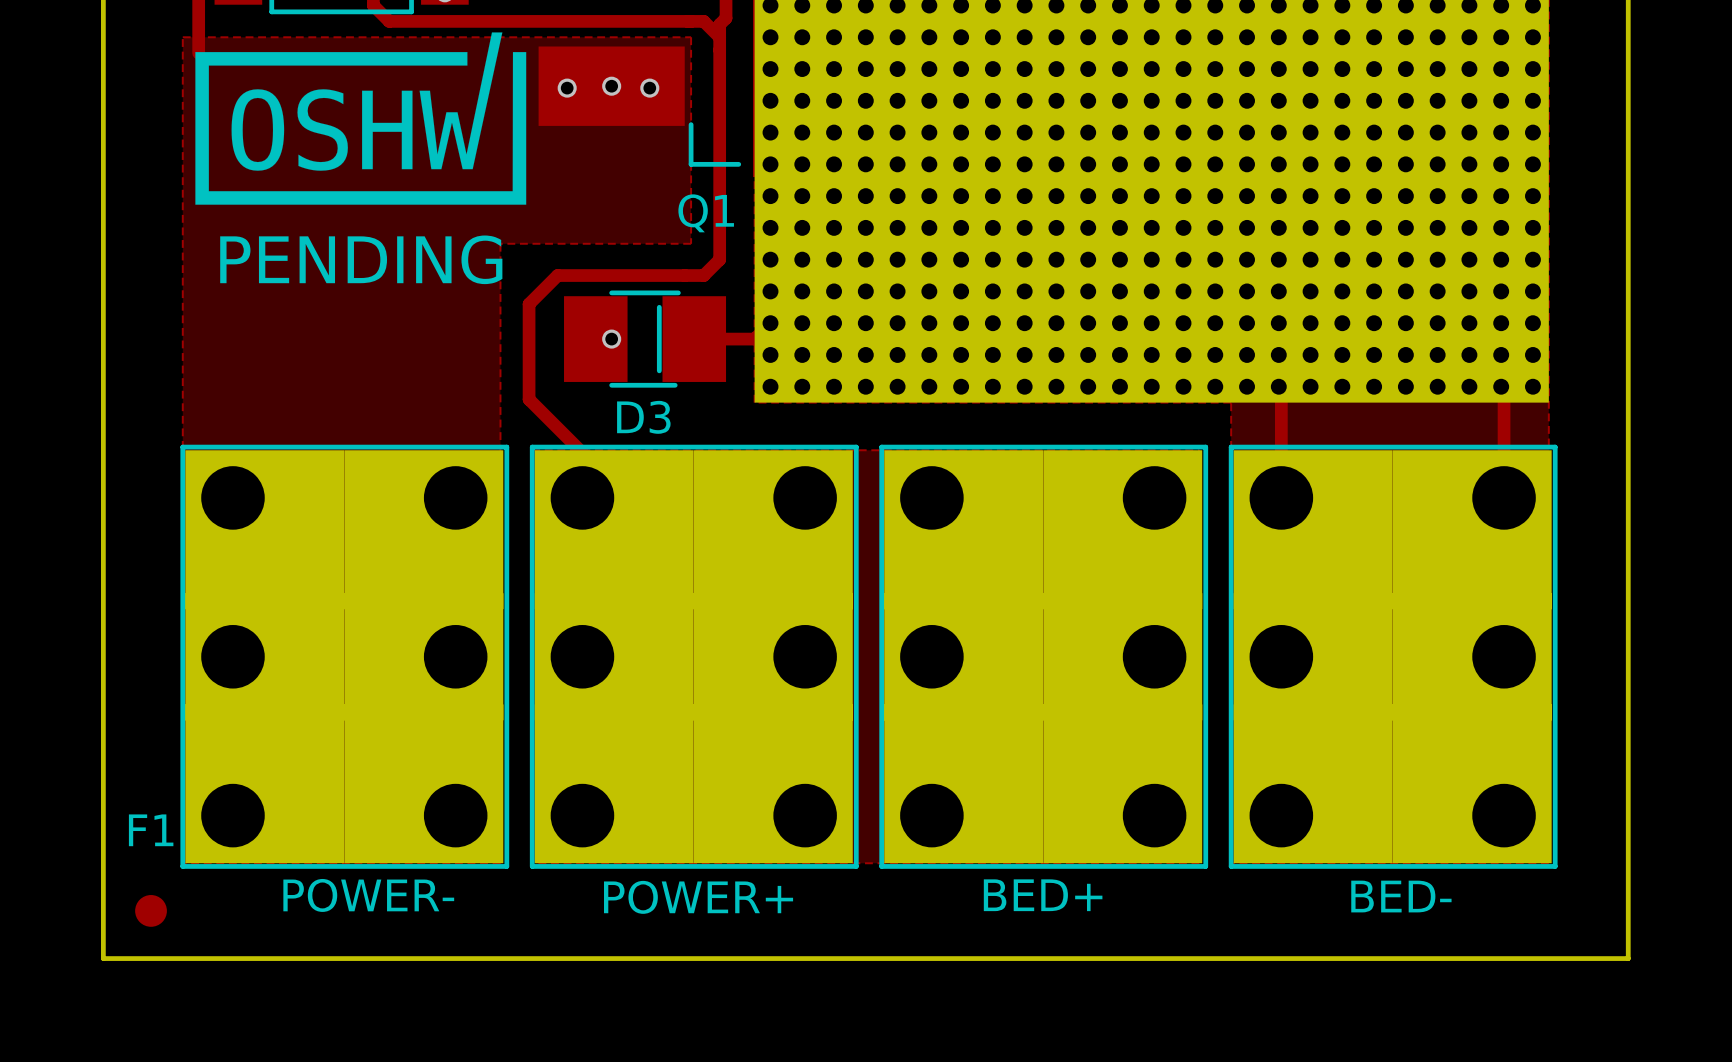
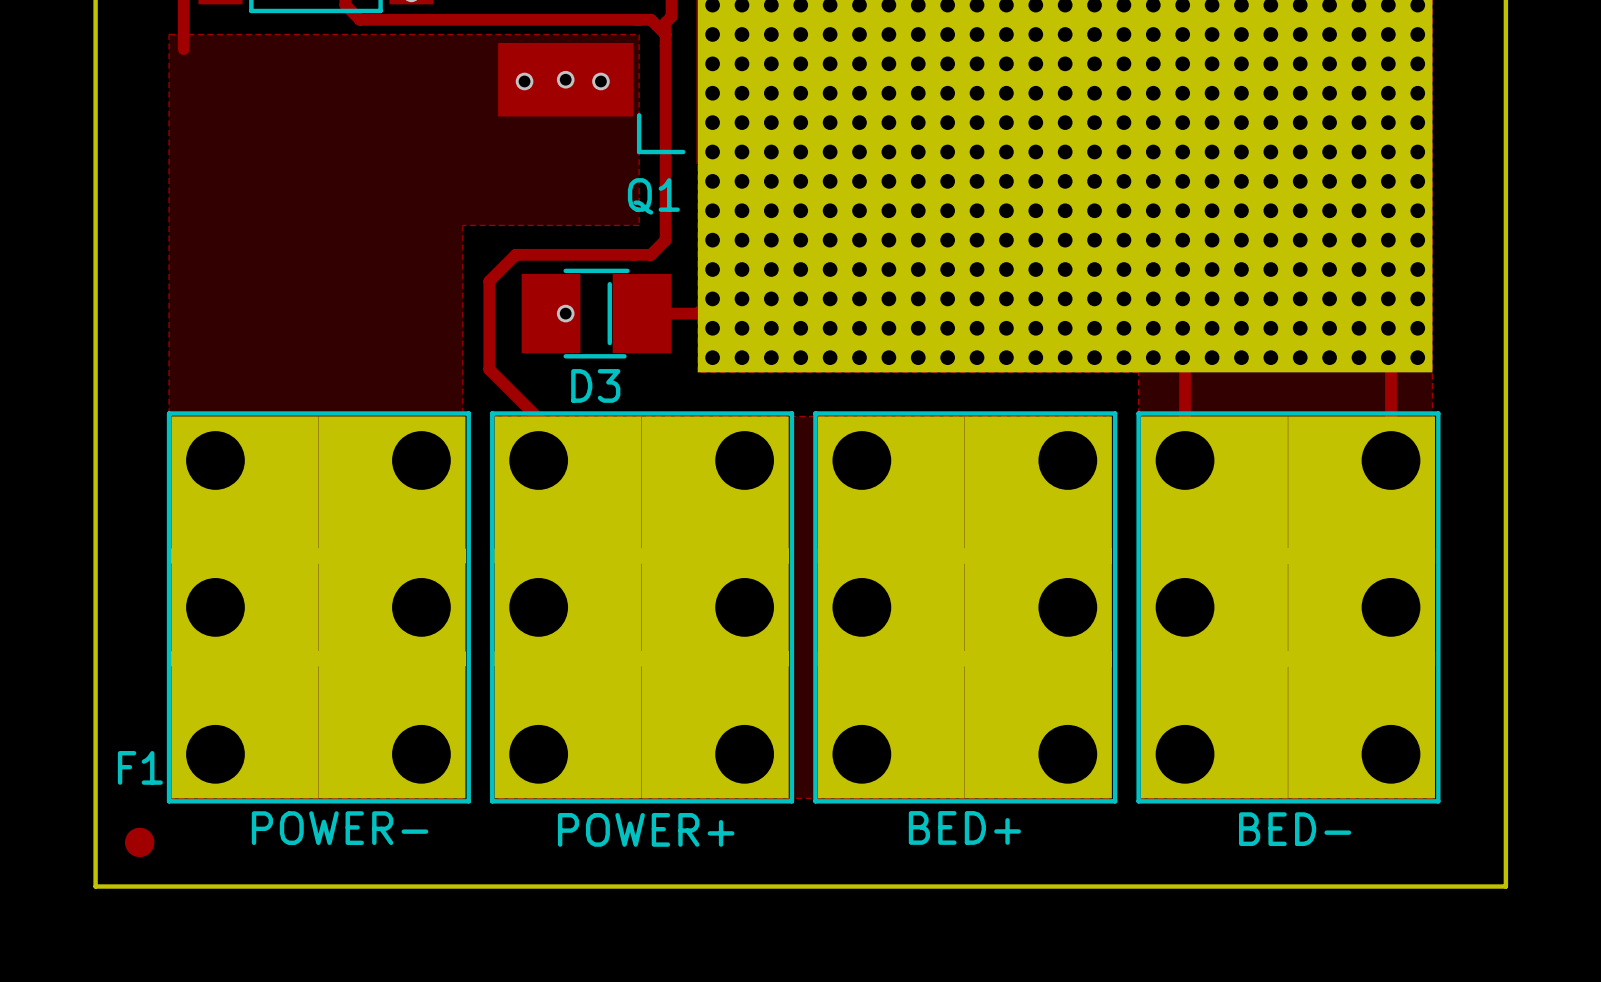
drawing: [195, 32, 527, 205] -> none

